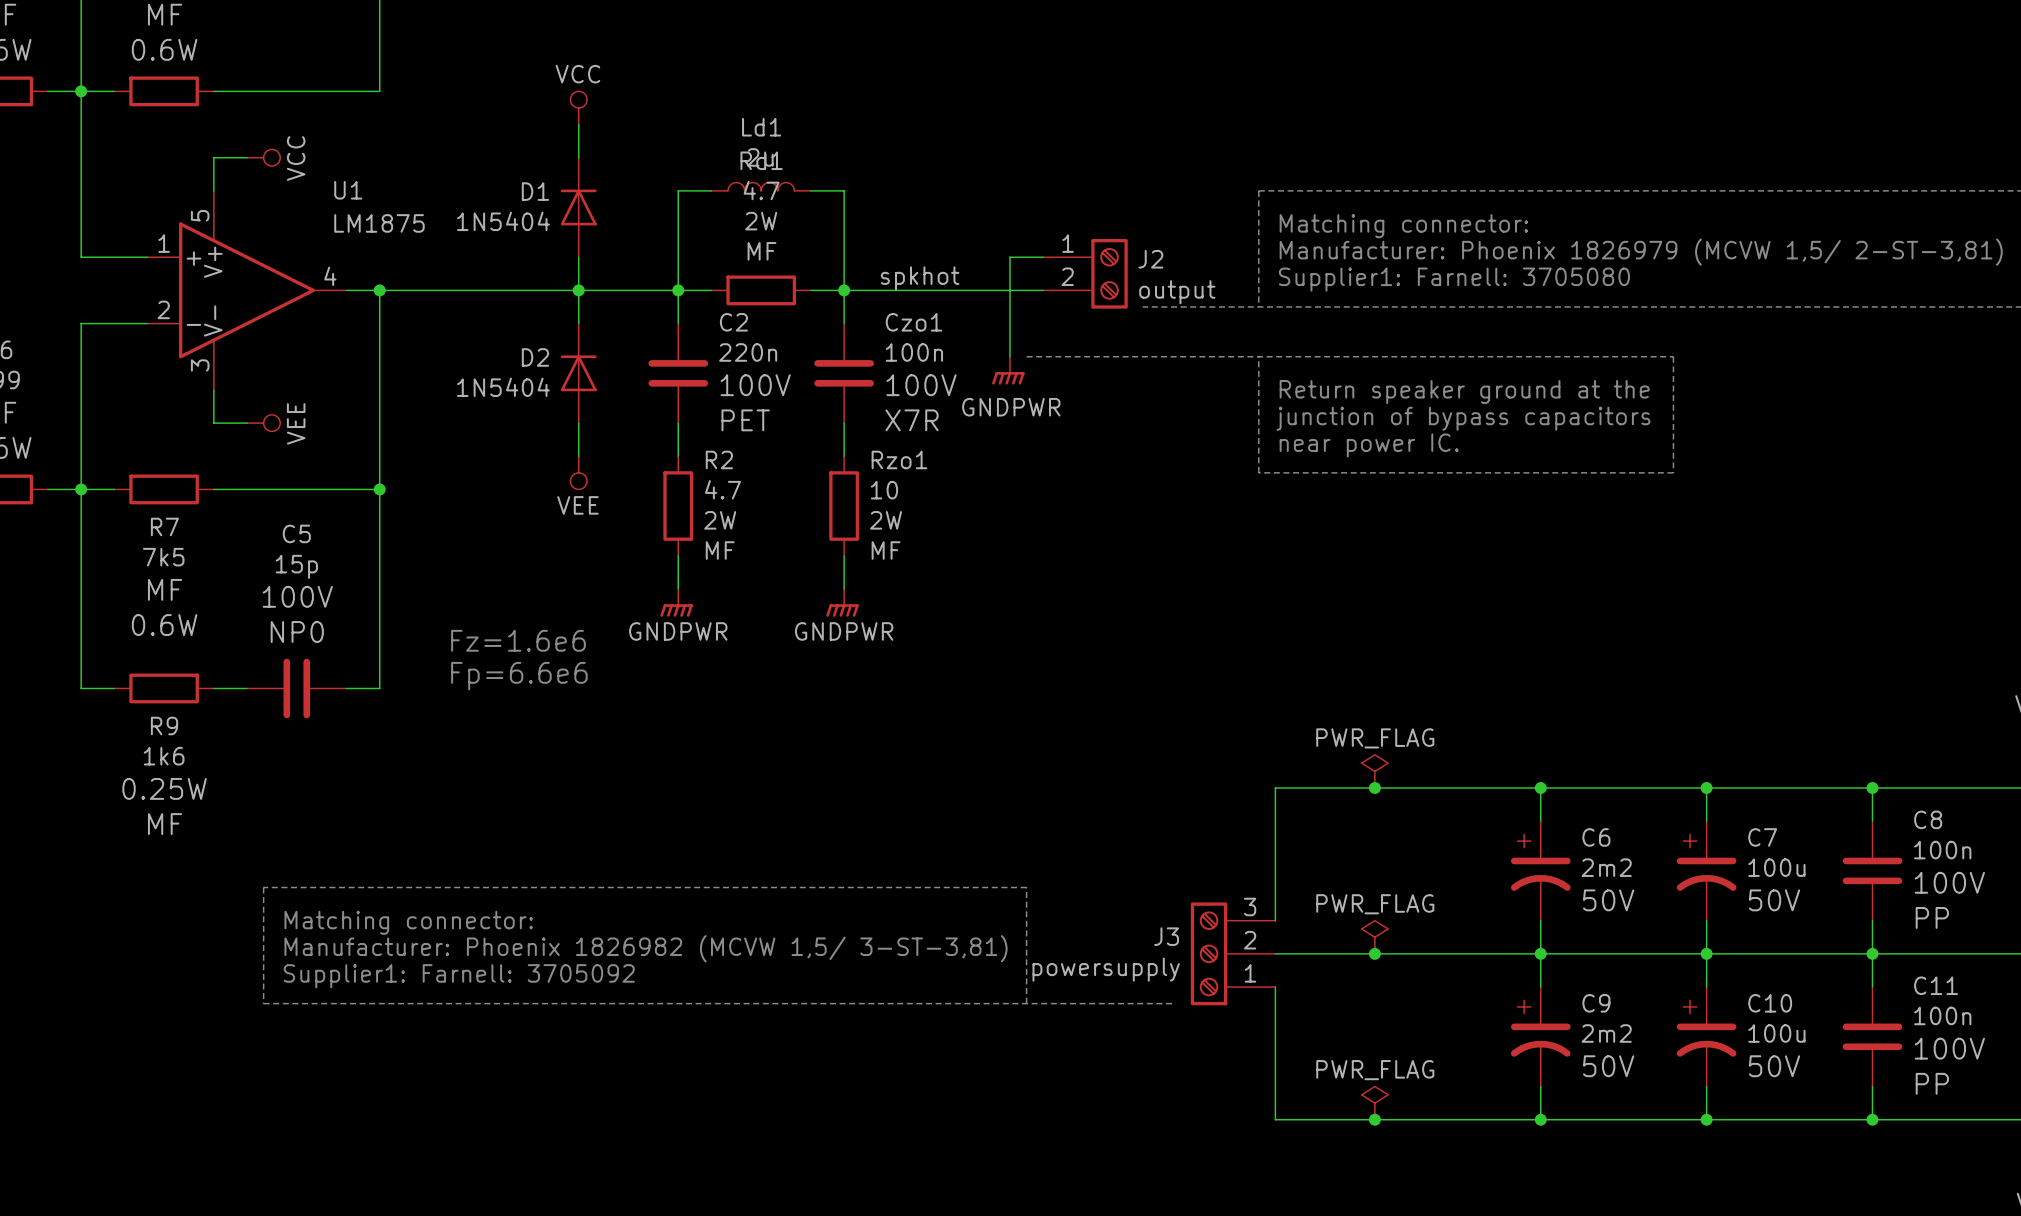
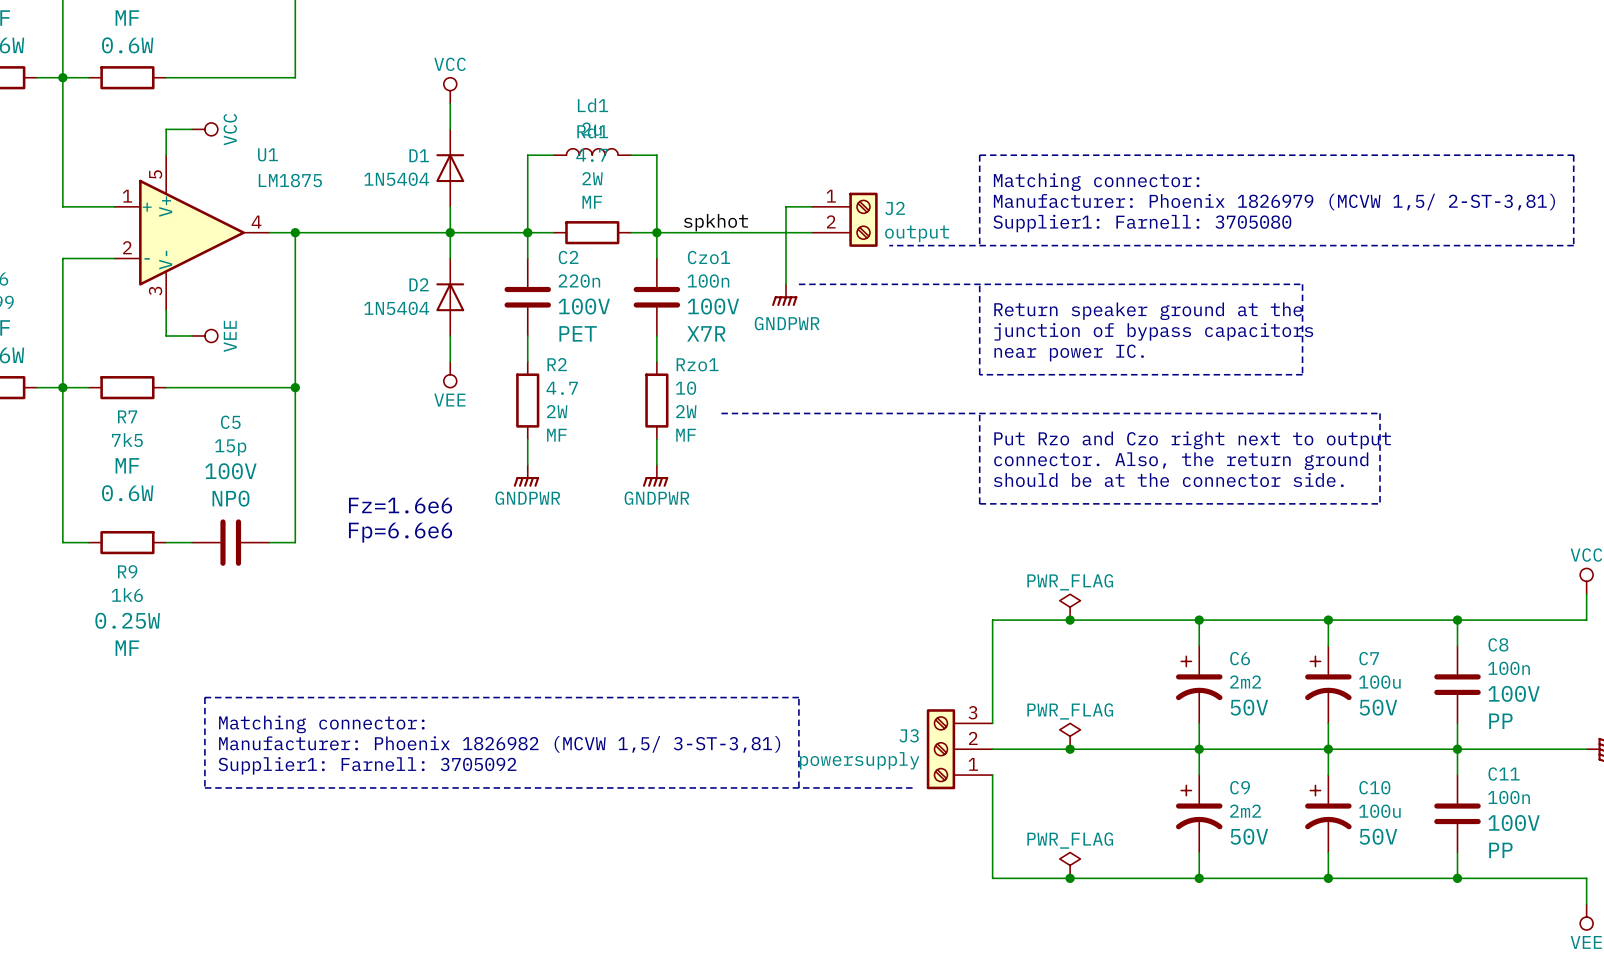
line: none -> (721, 413) (1380, 413) (1380, 503) (979, 503) (979, 413)
text: none -> Put Rzo and Czo right next to output (1192, 440)
text: none -> connector. Also, the return ground (1181, 461)
text: none -> should be at the connector side. (1168, 480)

